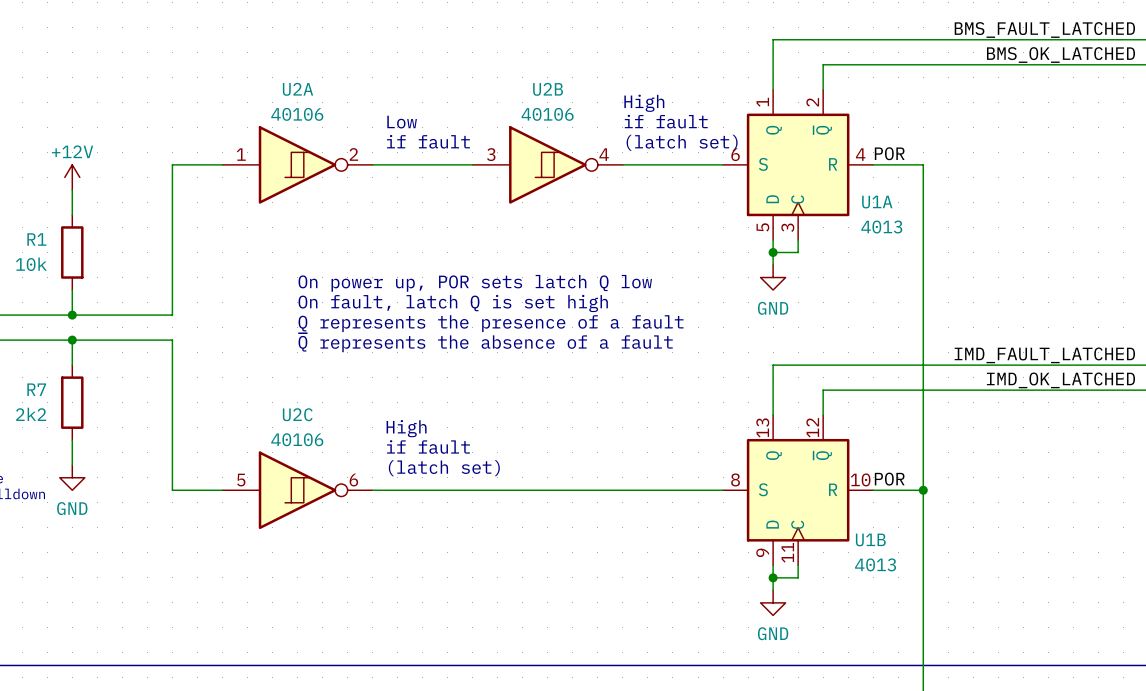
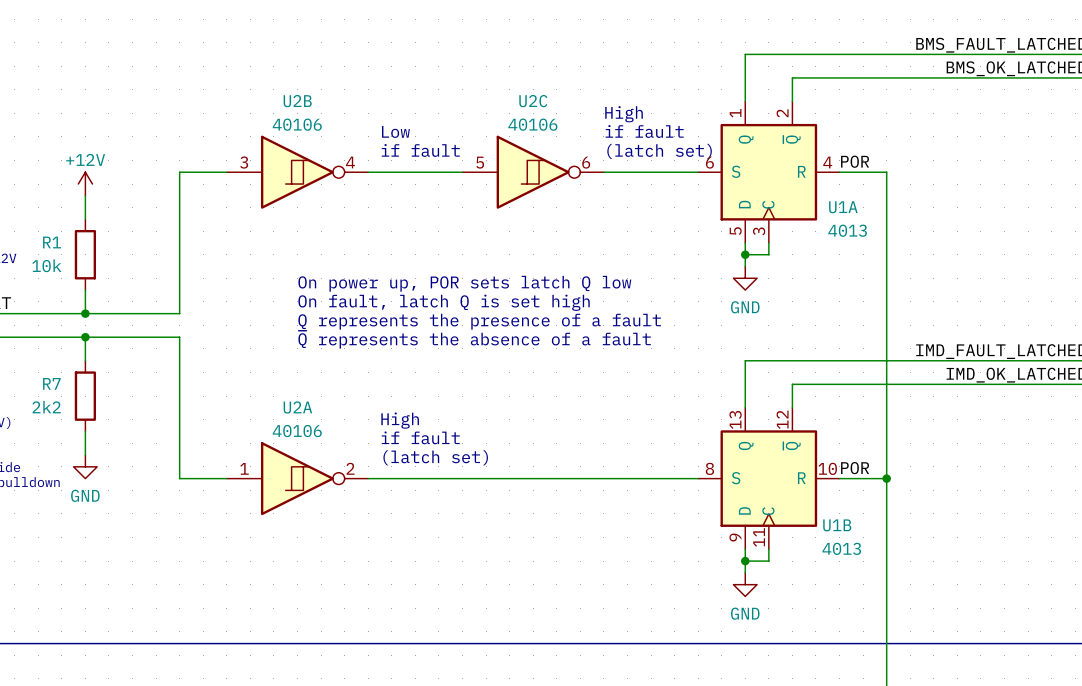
U2A position: (297, 164) -> (297, 478)
U2B position: (547, 164) -> (297, 172)
U2C position: (297, 490) -> (533, 172)

